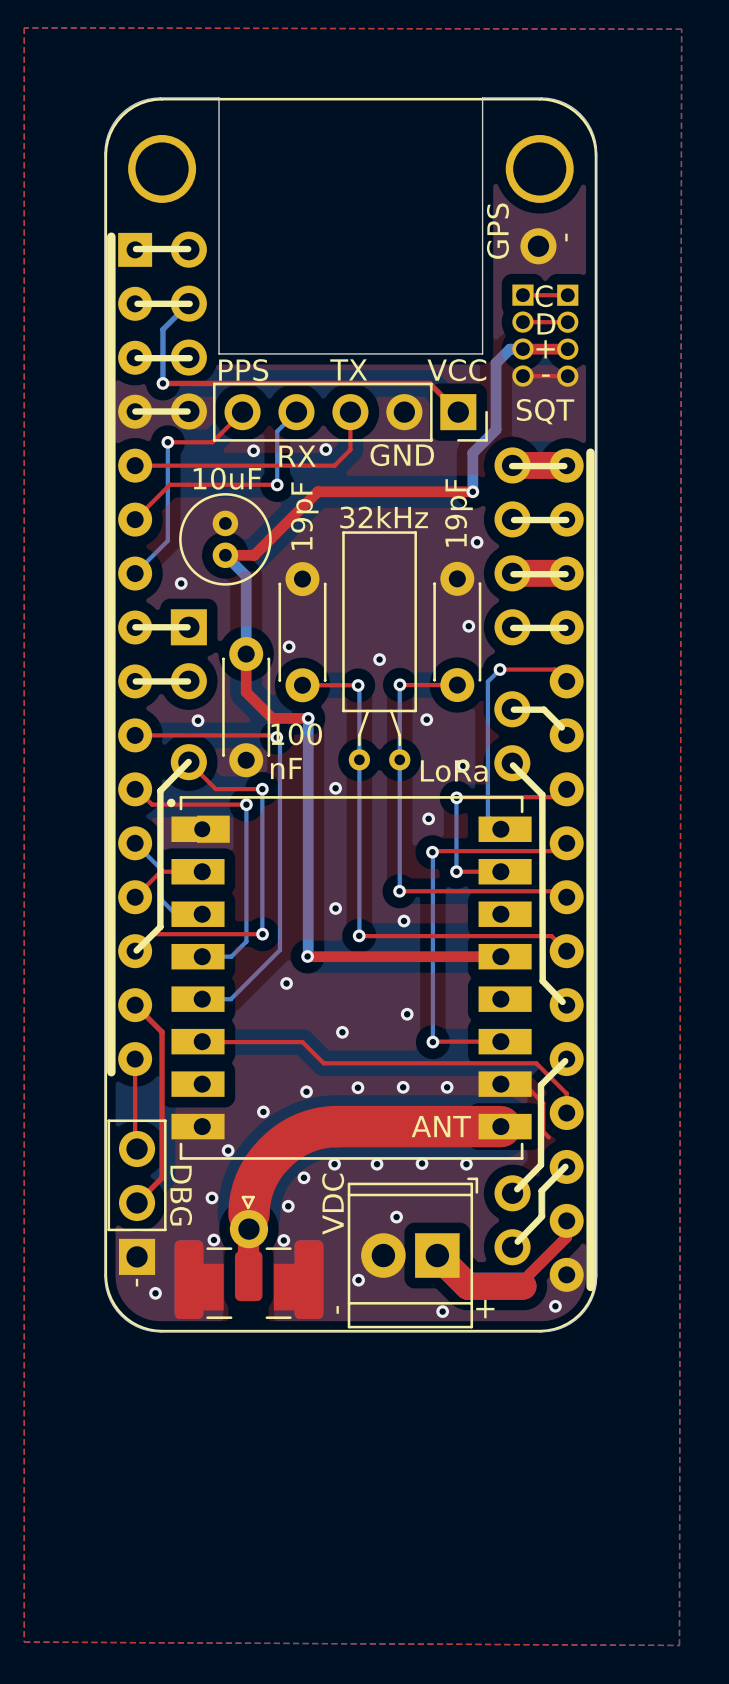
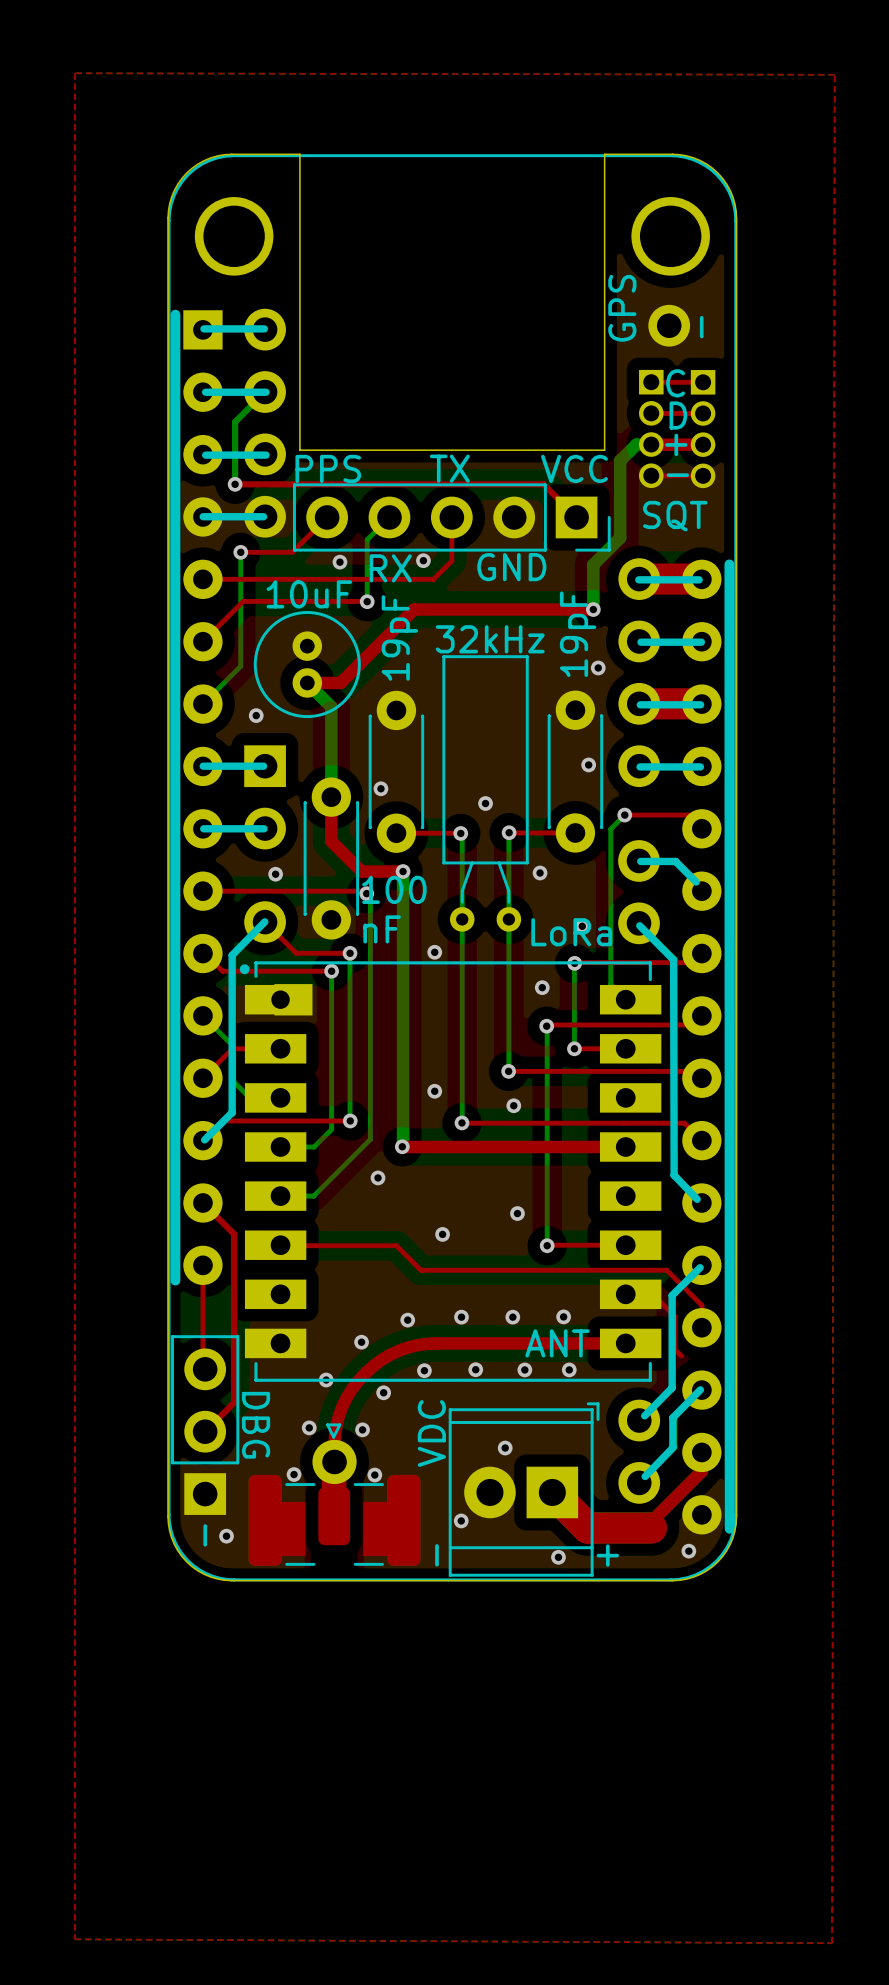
via position: (357, 1087) -> (461, 1317)
via position: (403, 1087) -> (512, 1317)
via position: (447, 1087) -> (563, 1316)
via position: (306, 1091) -> (407, 1320)
via position: (263, 1111) -> (361, 1342)
top track width: thick (500, 1126) (328, 1127) (312, 1130) (296, 1136) (276, 1151) -> thin (625, 1343) (426, 1343) (407, 1347) (389, 1355) (366, 1372)
via: none -> (524, 1369)
via: none -> (569, 1369)
via position: (228, 1150) -> (326, 1380)
top track width: thick (273, 1154) (263, 1167) (255, 1181) (250, 1197) (248, 1214) -> thin (363, 1375) (351, 1390) (342, 1407) (336, 1425) (334, 1445)
via: (422, 1163) -> none
via position: (334, 1164) -> (424, 1370)
via position: (377, 1164) -> (475, 1369)
via: (466, 1164) -> none
via position: (303, 1177) -> (383, 1392)
via position: (212, 1197) -> (309, 1427)
via position: (288, 1206) -> (362, 1429)

